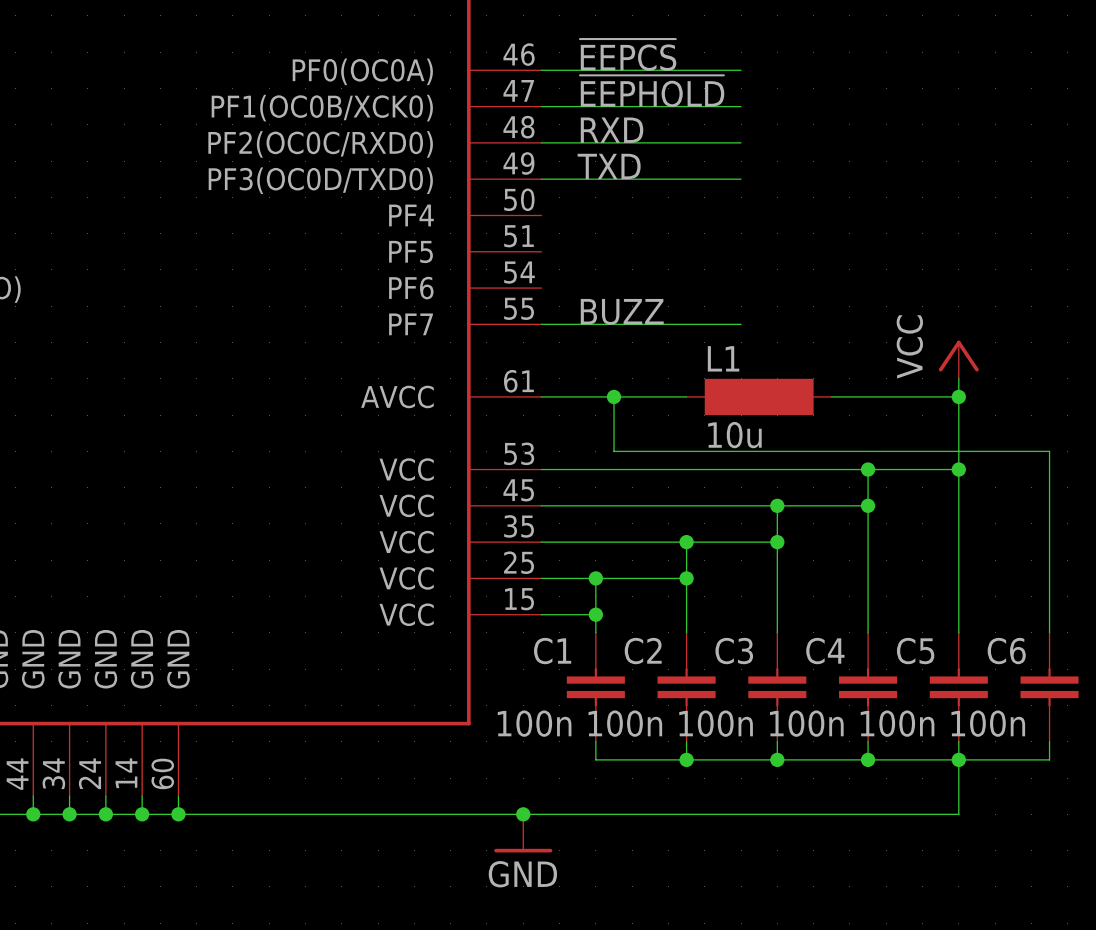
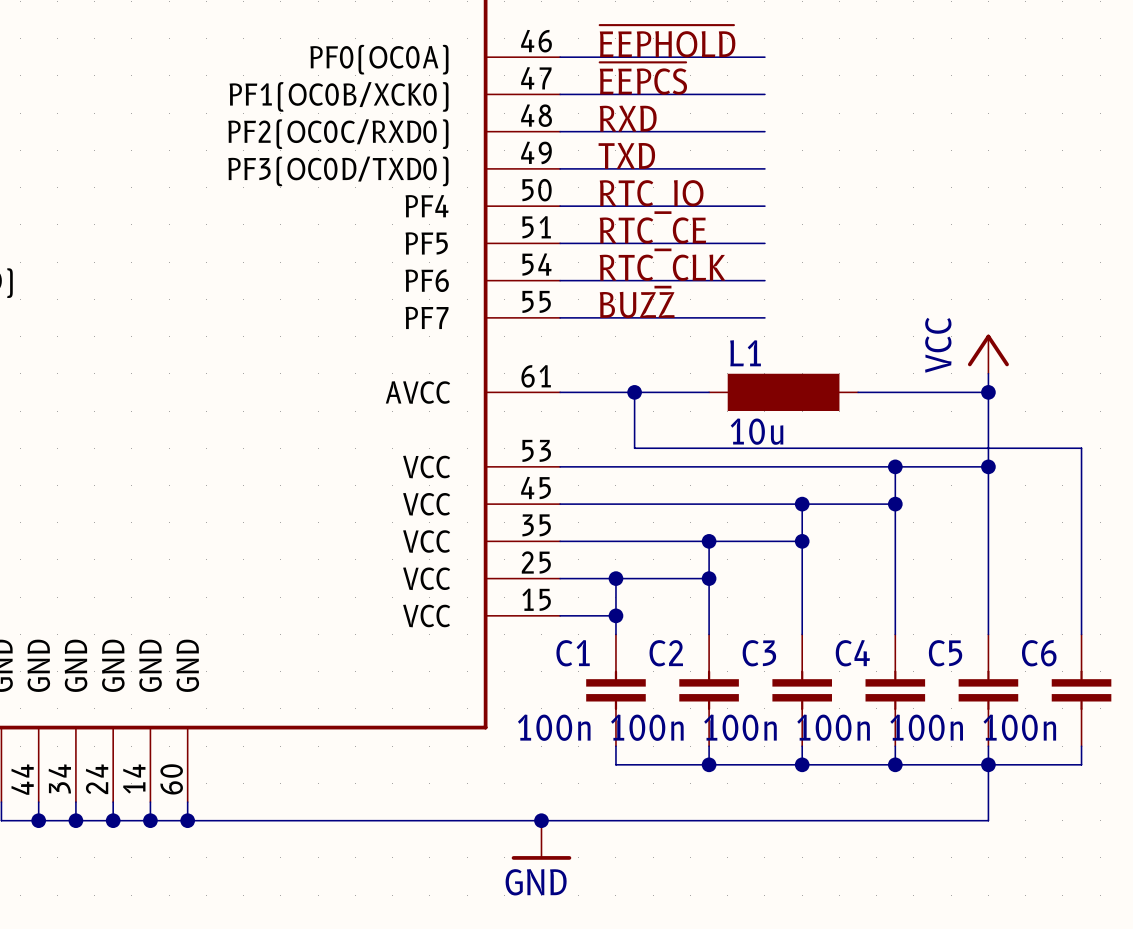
label: ~{EEPCS} (628, 54) -> ~{EEPHOLD} (667, 41)
label: ~{EEPHOLD} (652, 91) -> ~{EEPCS} (643, 78)
label: none -> RTC_IO (651, 197)
wire: none -> (560, 206) (764, 206)
label: none -> RTC_CE (652, 234)
wire: none -> (560, 243) (764, 243)
label: none -> RTC_CLK (662, 271)
wire: none -> (560, 280) (764, 280)

